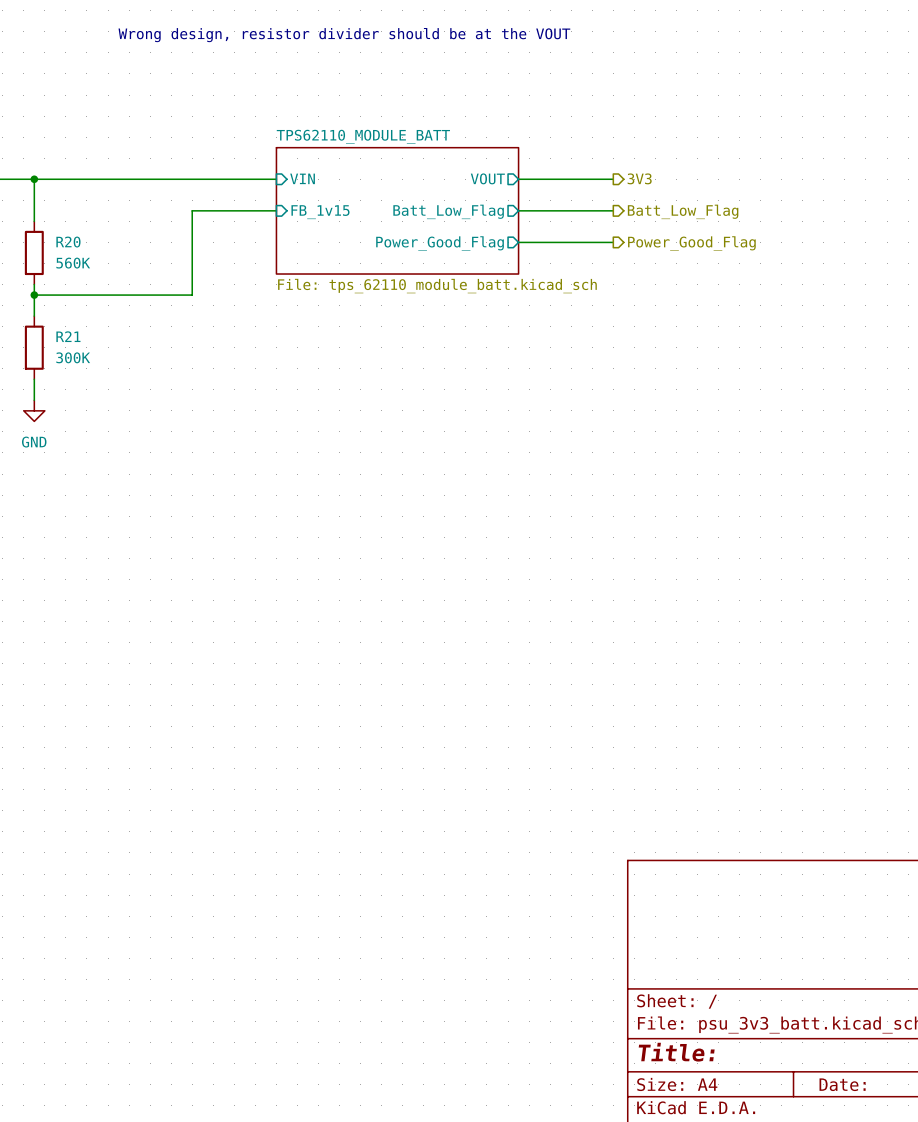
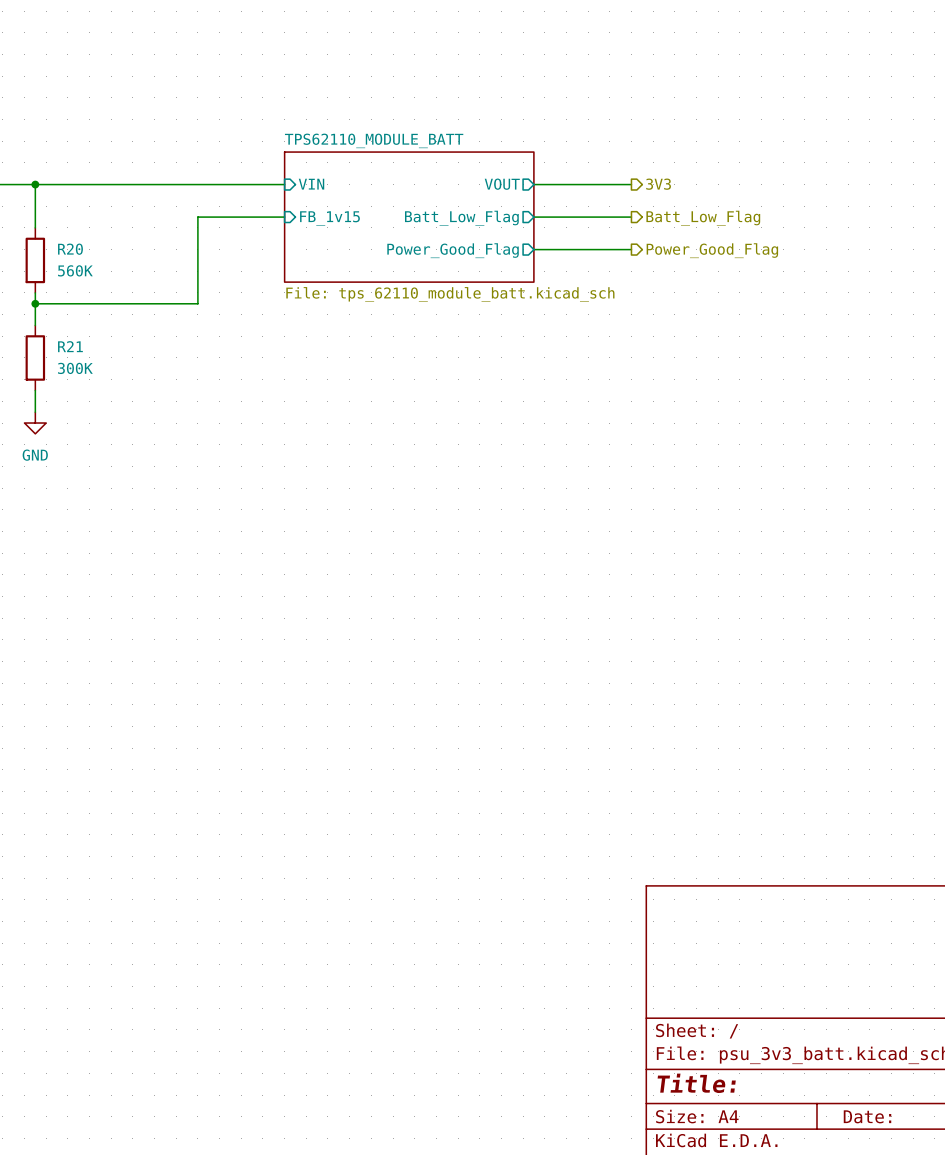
text: Wrong design, resistor divider should be at the VOUT (344, 35) -> none

